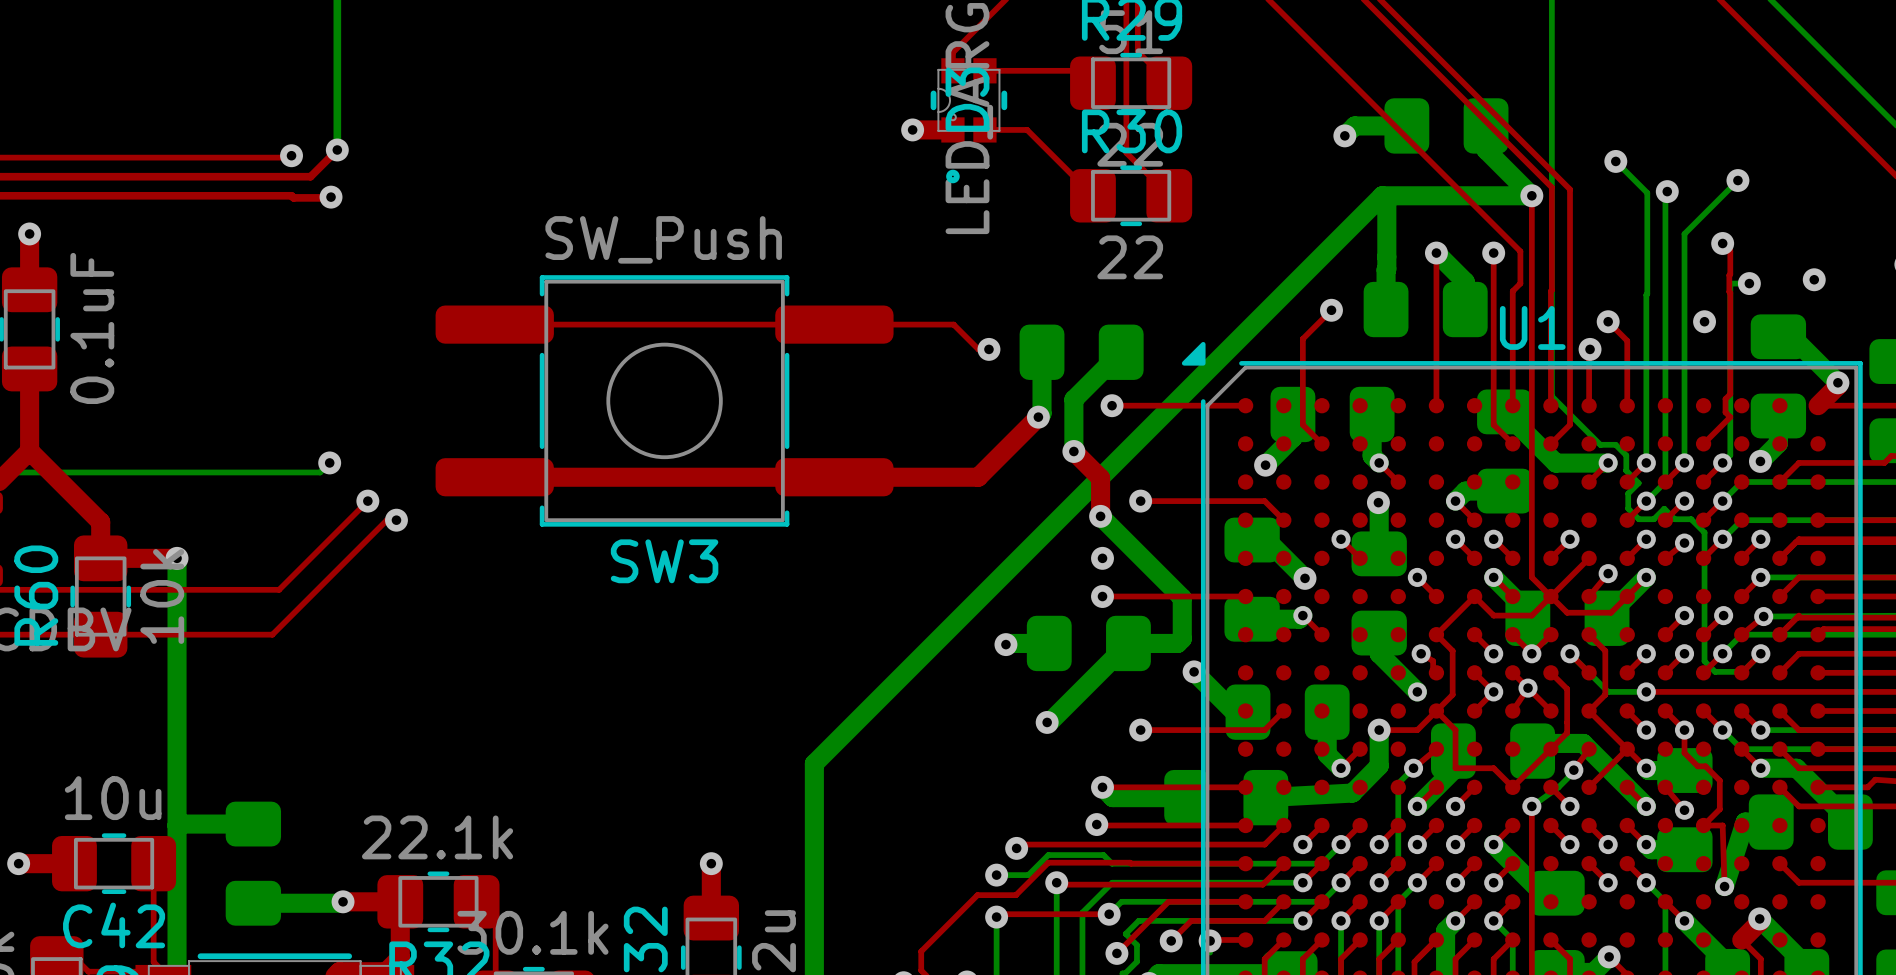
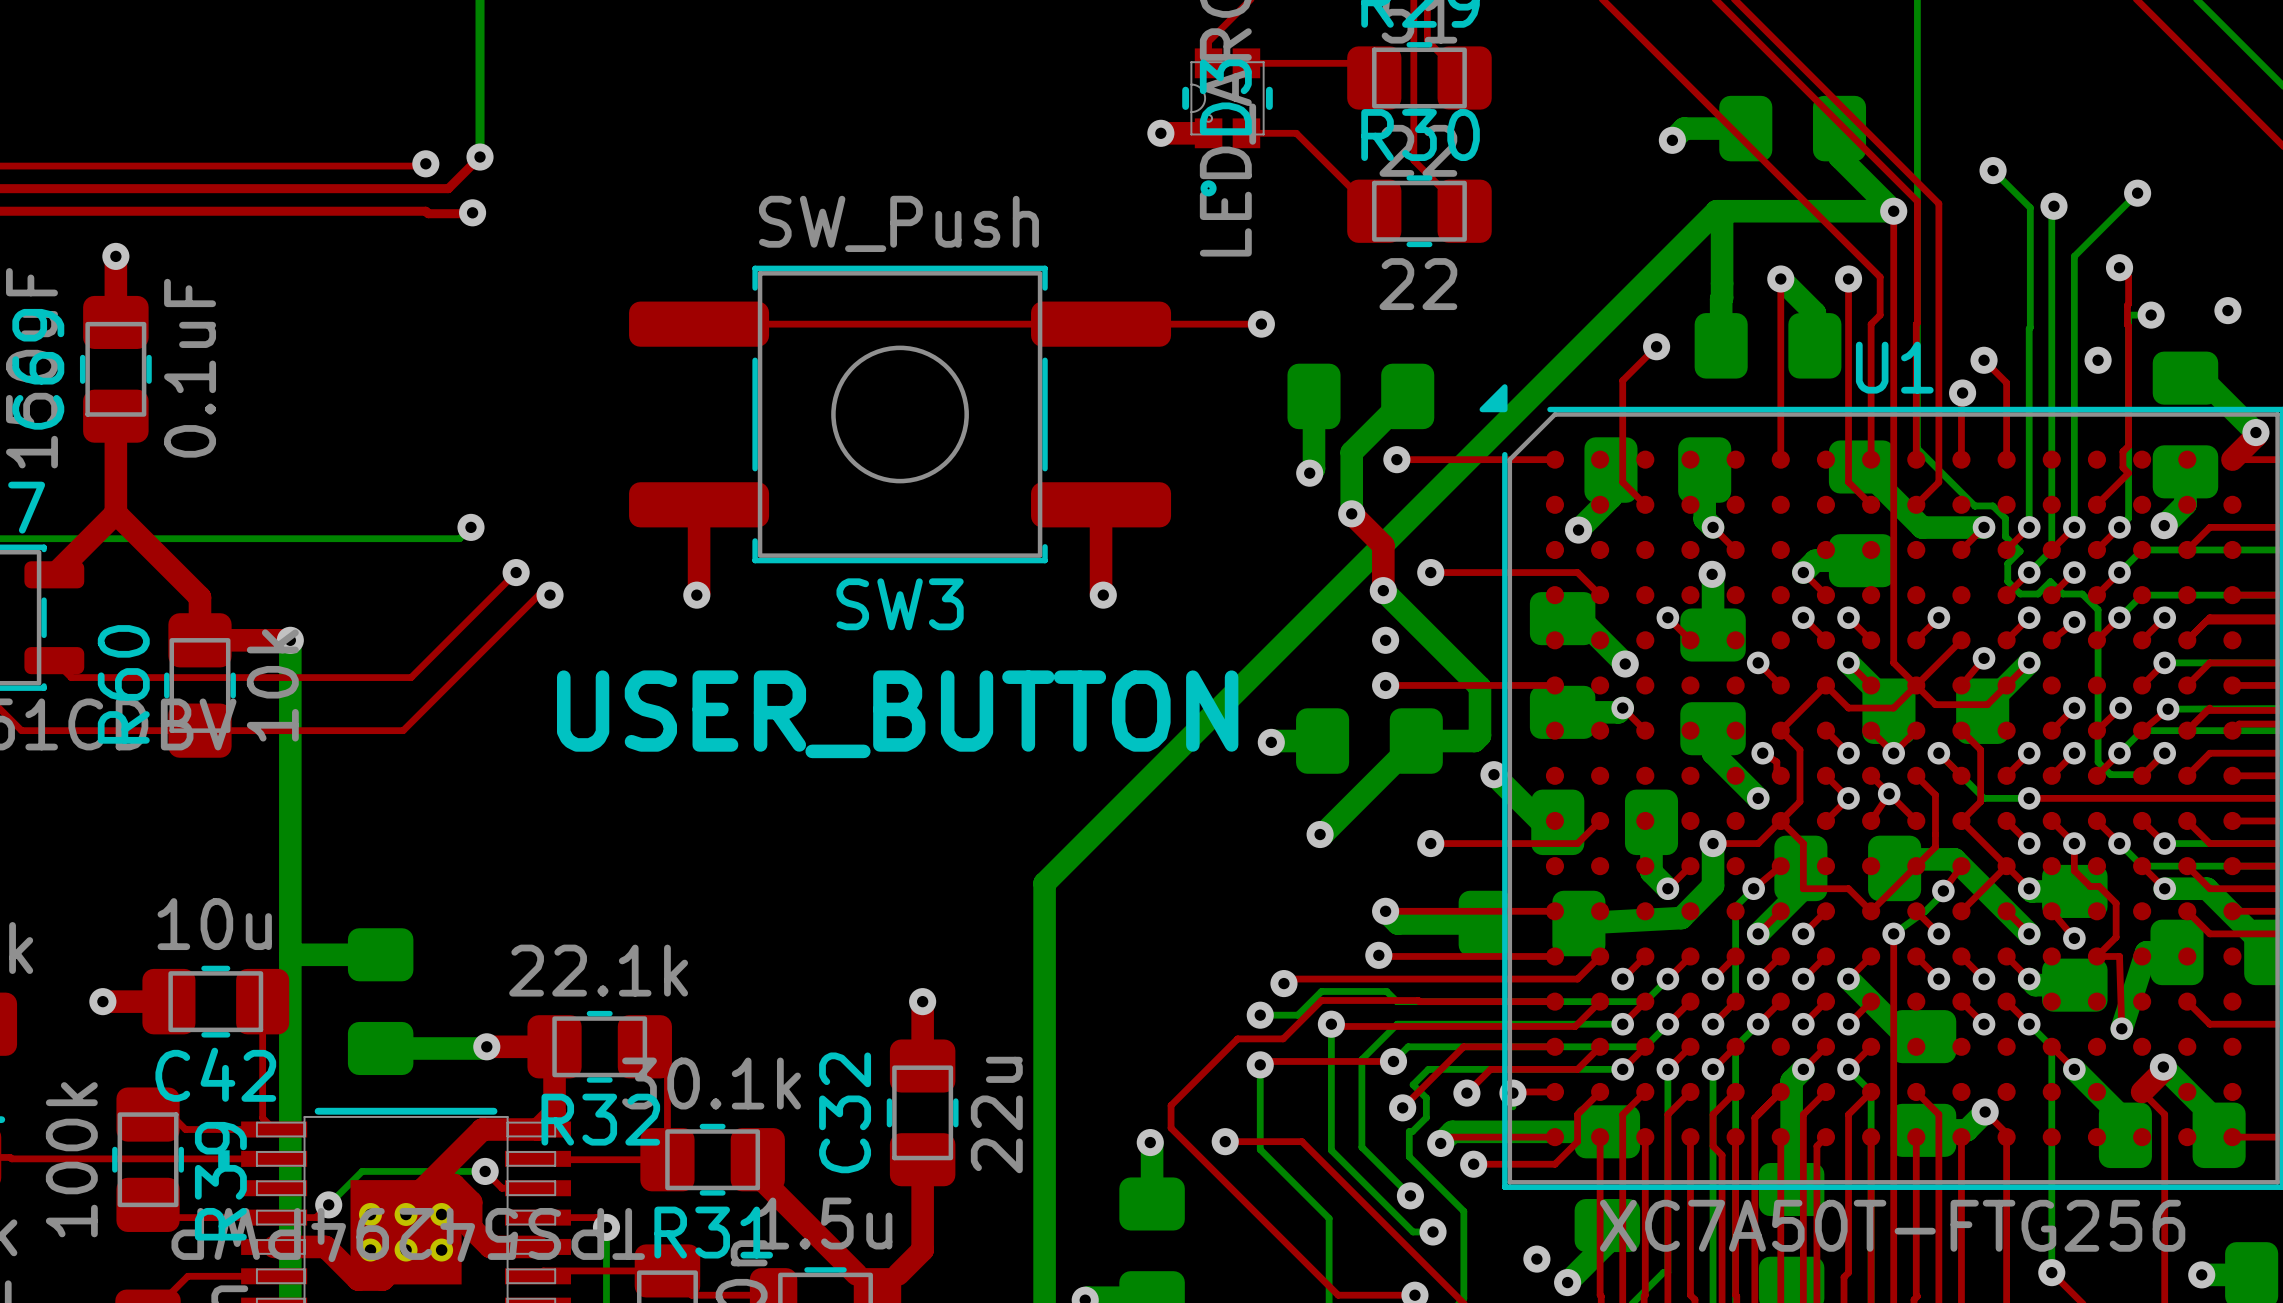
top track: none -> (699, 324) (1261, 324)
top track: (494, 324) (953, 324) (978, 349) (988, 349) -> none
via position: (988, 349) -> (1261, 324)
SW3 position: (664, 400) -> (900, 414)
top track: (1038, 417) (978, 477) (494, 477) -> none
top track: none -> (699, 504) (699, 592) (696, 595)
top track: none -> (1101, 504) (1101, 592) (1103, 595)
via: none -> (696, 595)
via: none -> (1103, 595)
text: none -> USER_BUTTON (897, 714)

